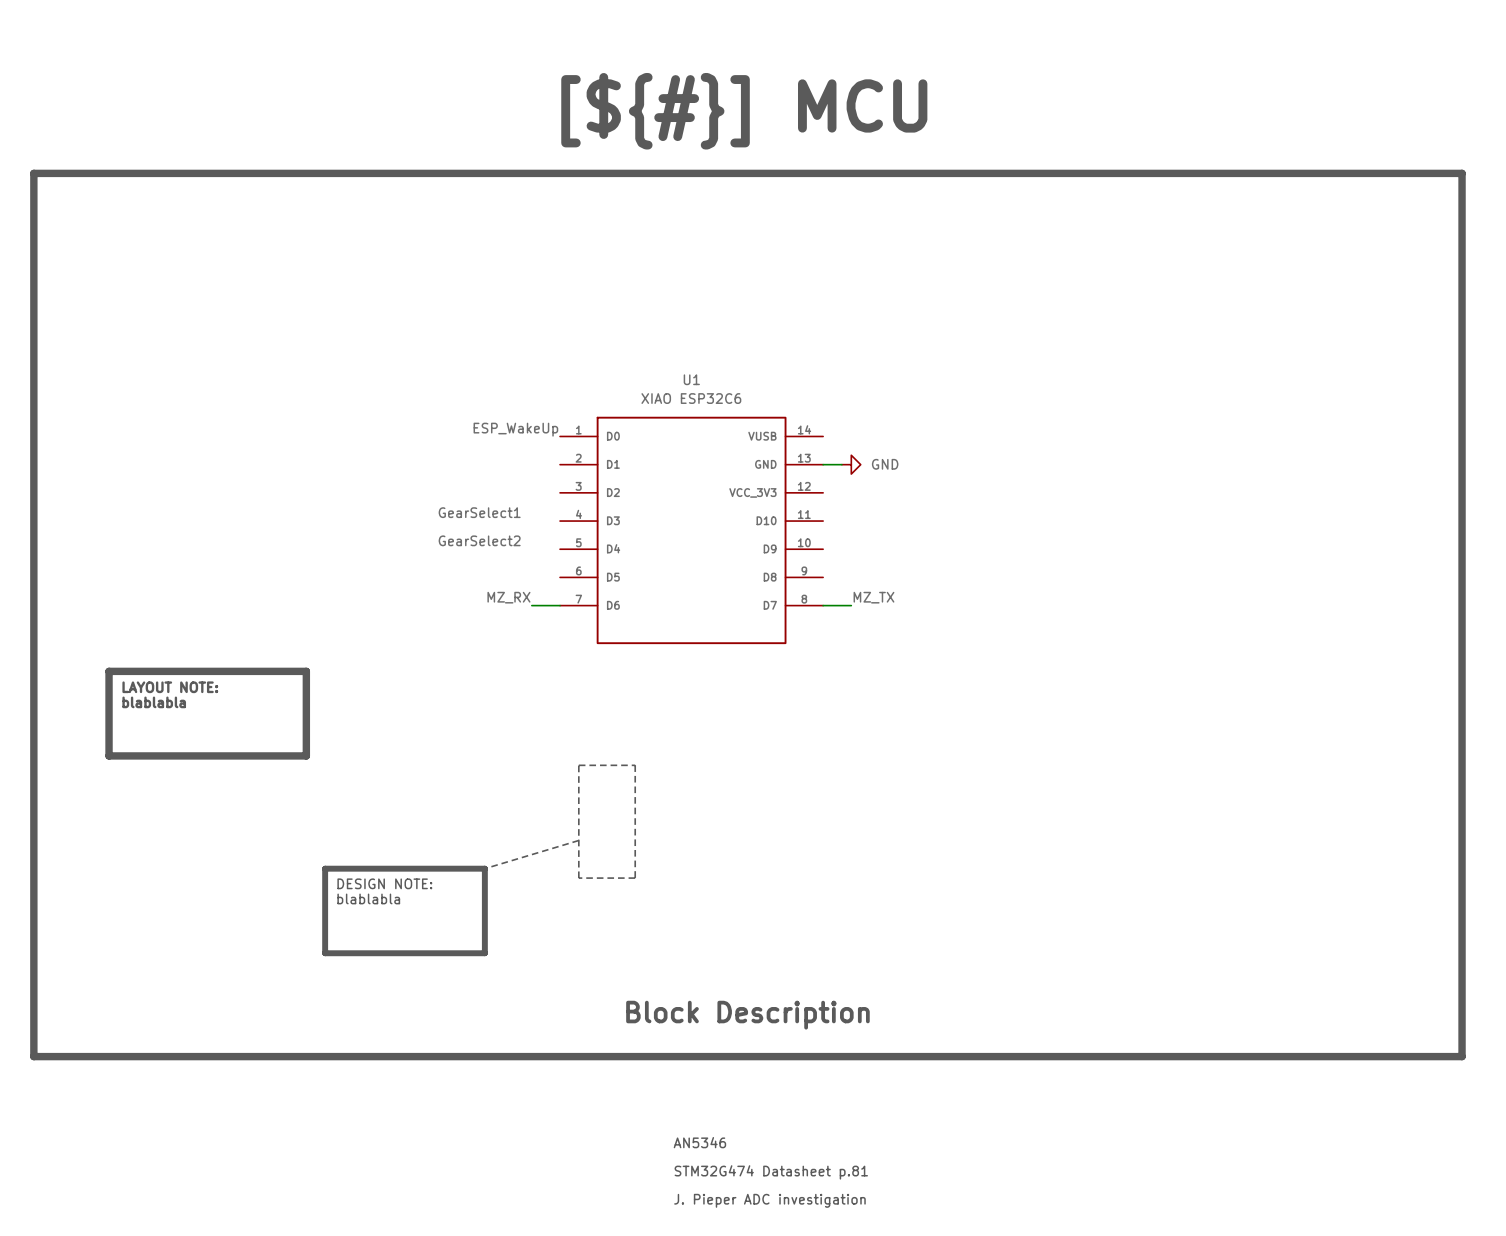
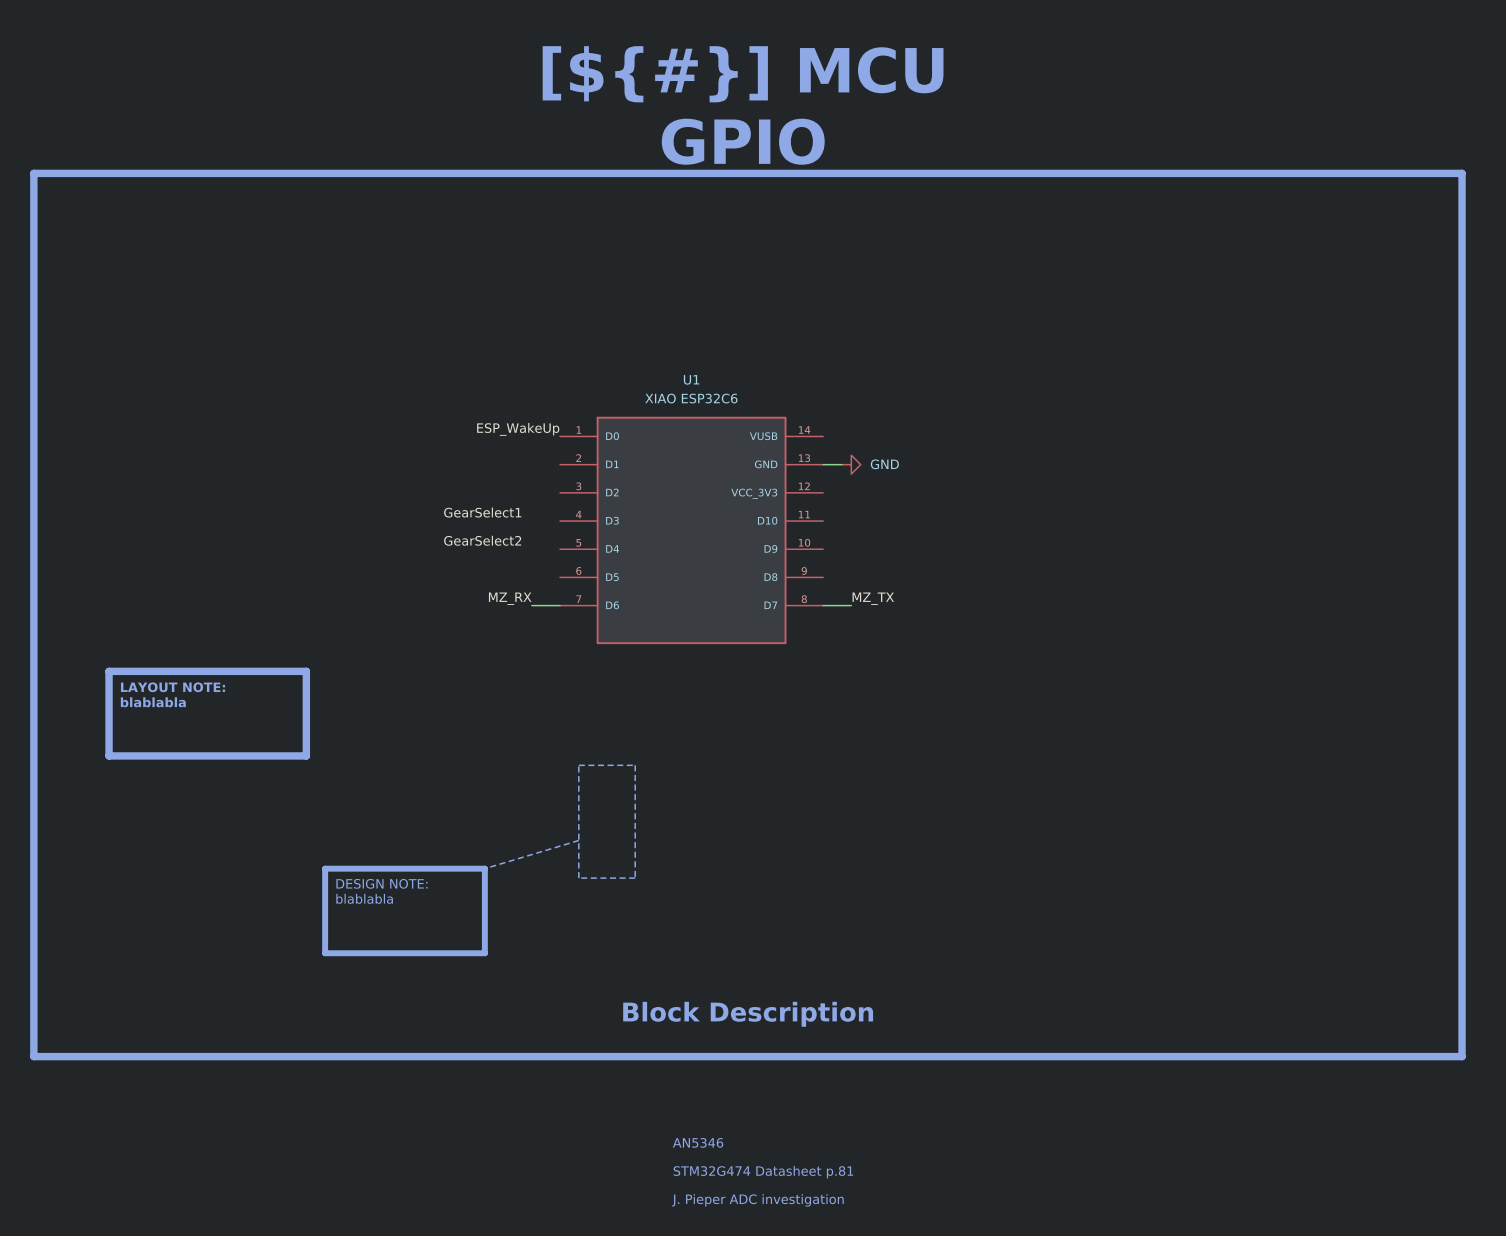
text position: [${#}] MCU (744, 111) -> [${#}] MCU (743, 74)
text: none -> GPIO (743, 141)

